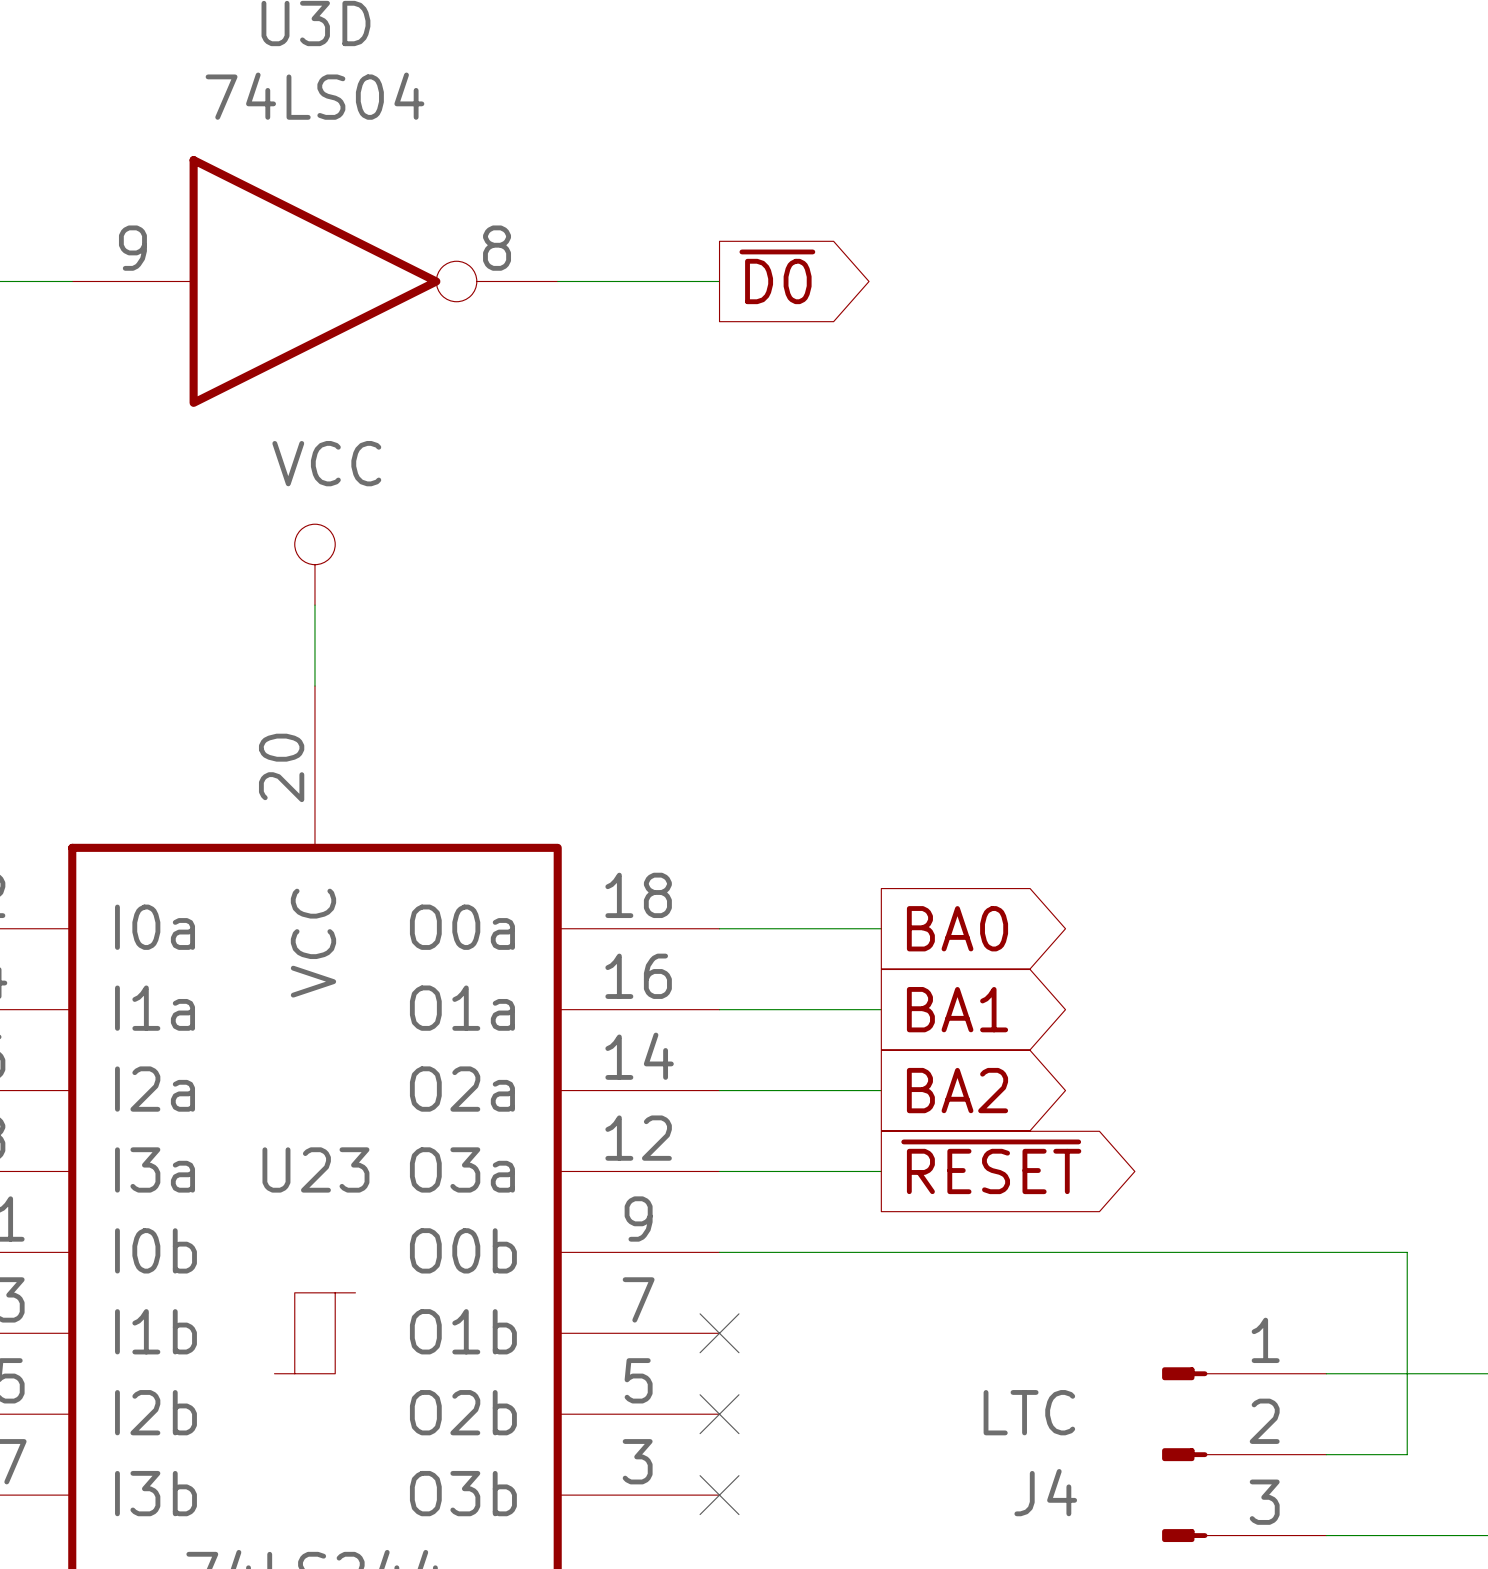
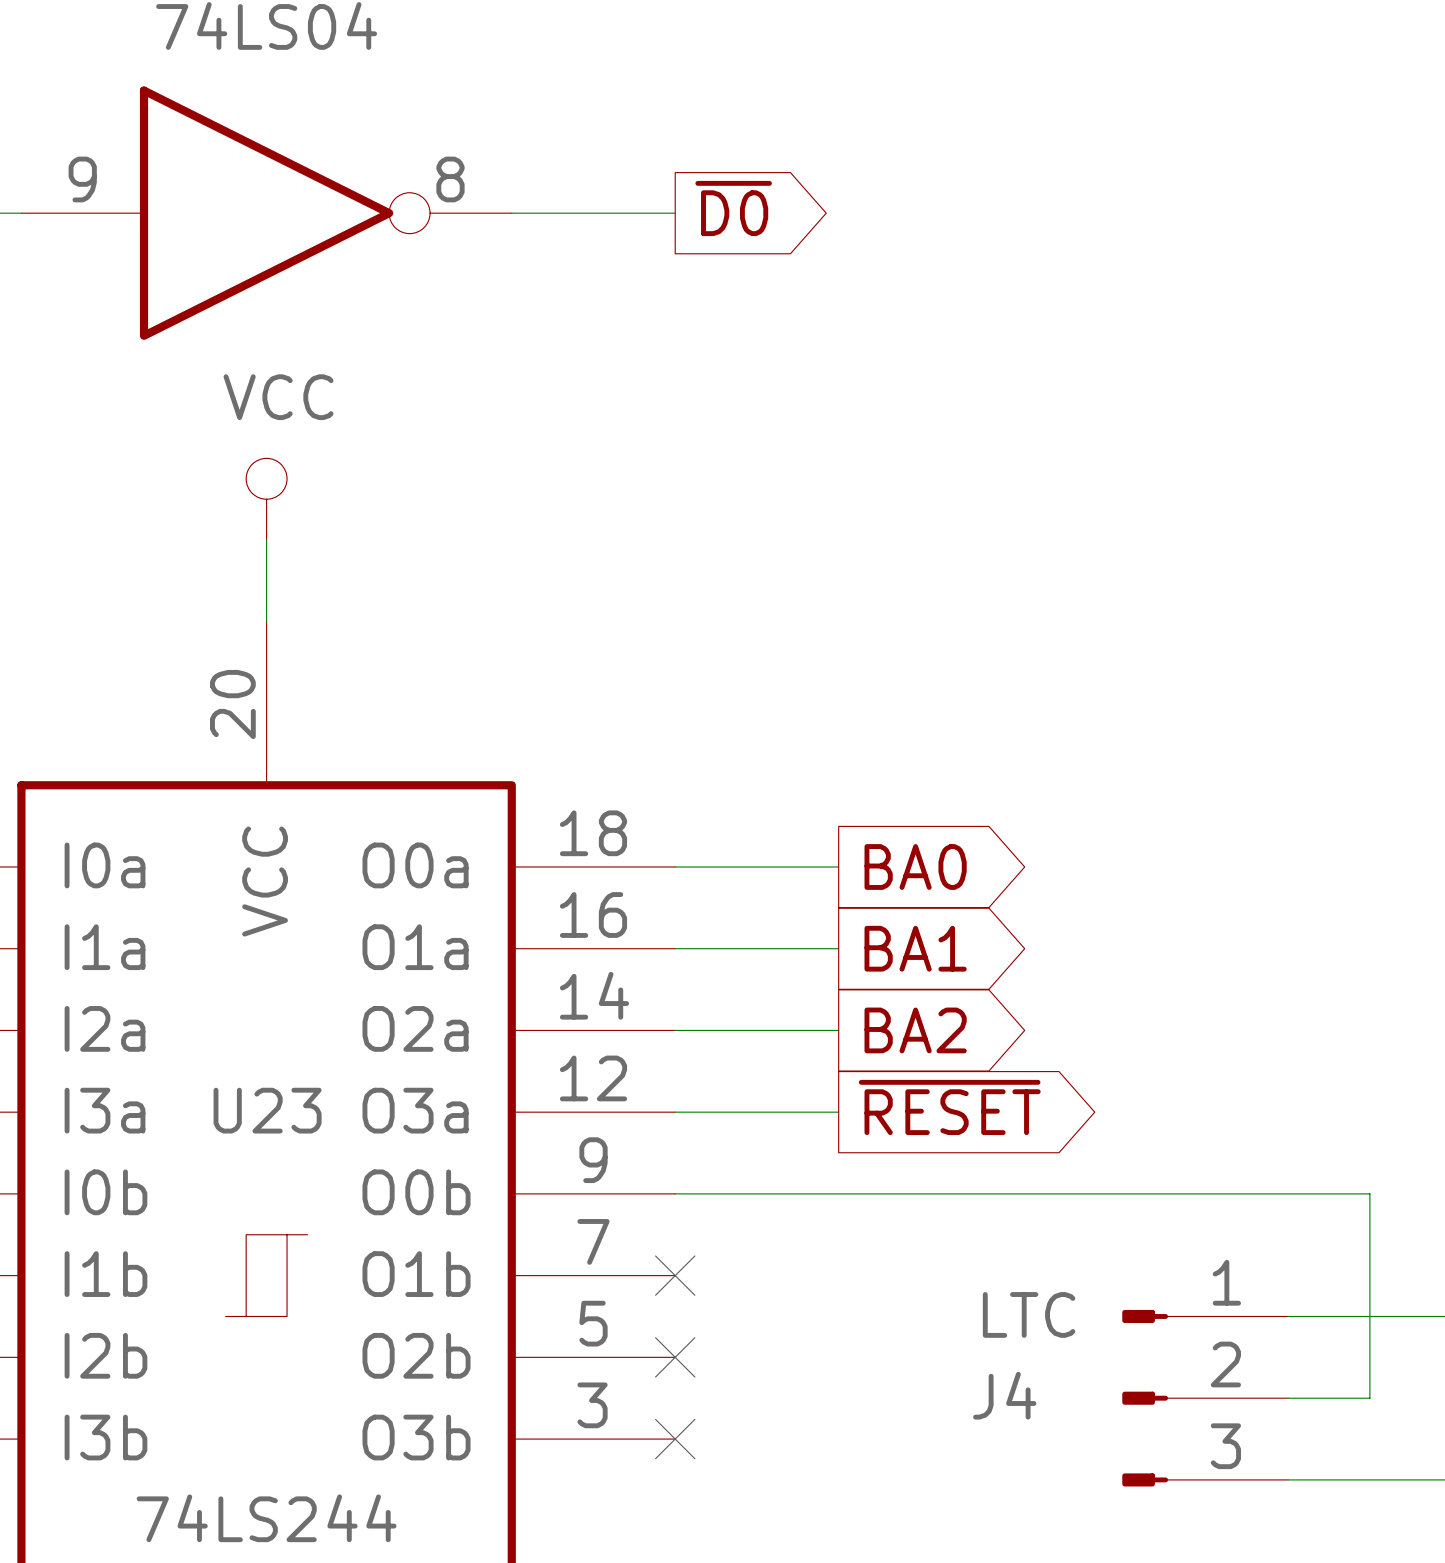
J4 value position: LTC (1029, 1412) -> LTC (1029, 1314)
J4 name position: J4 (1045, 1492) -> J4 (1004, 1395)

